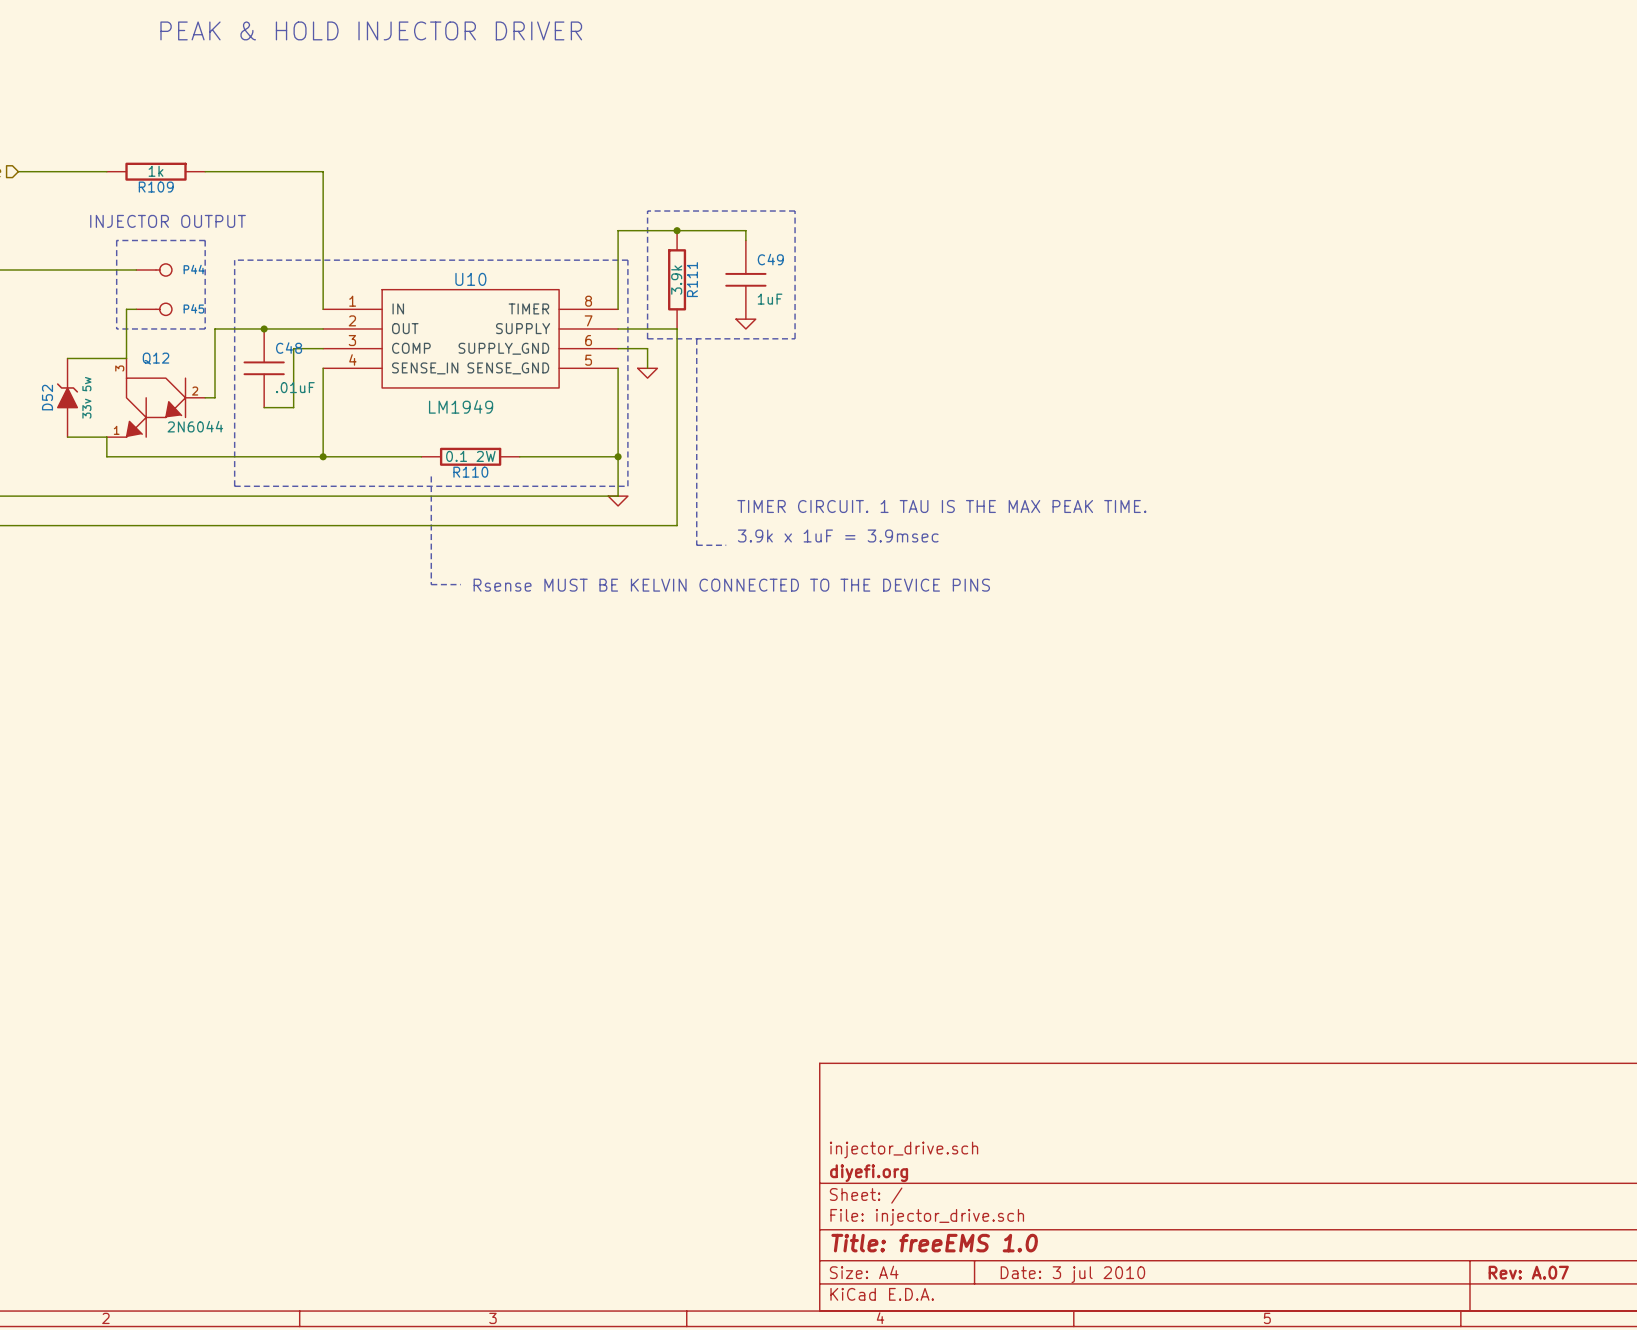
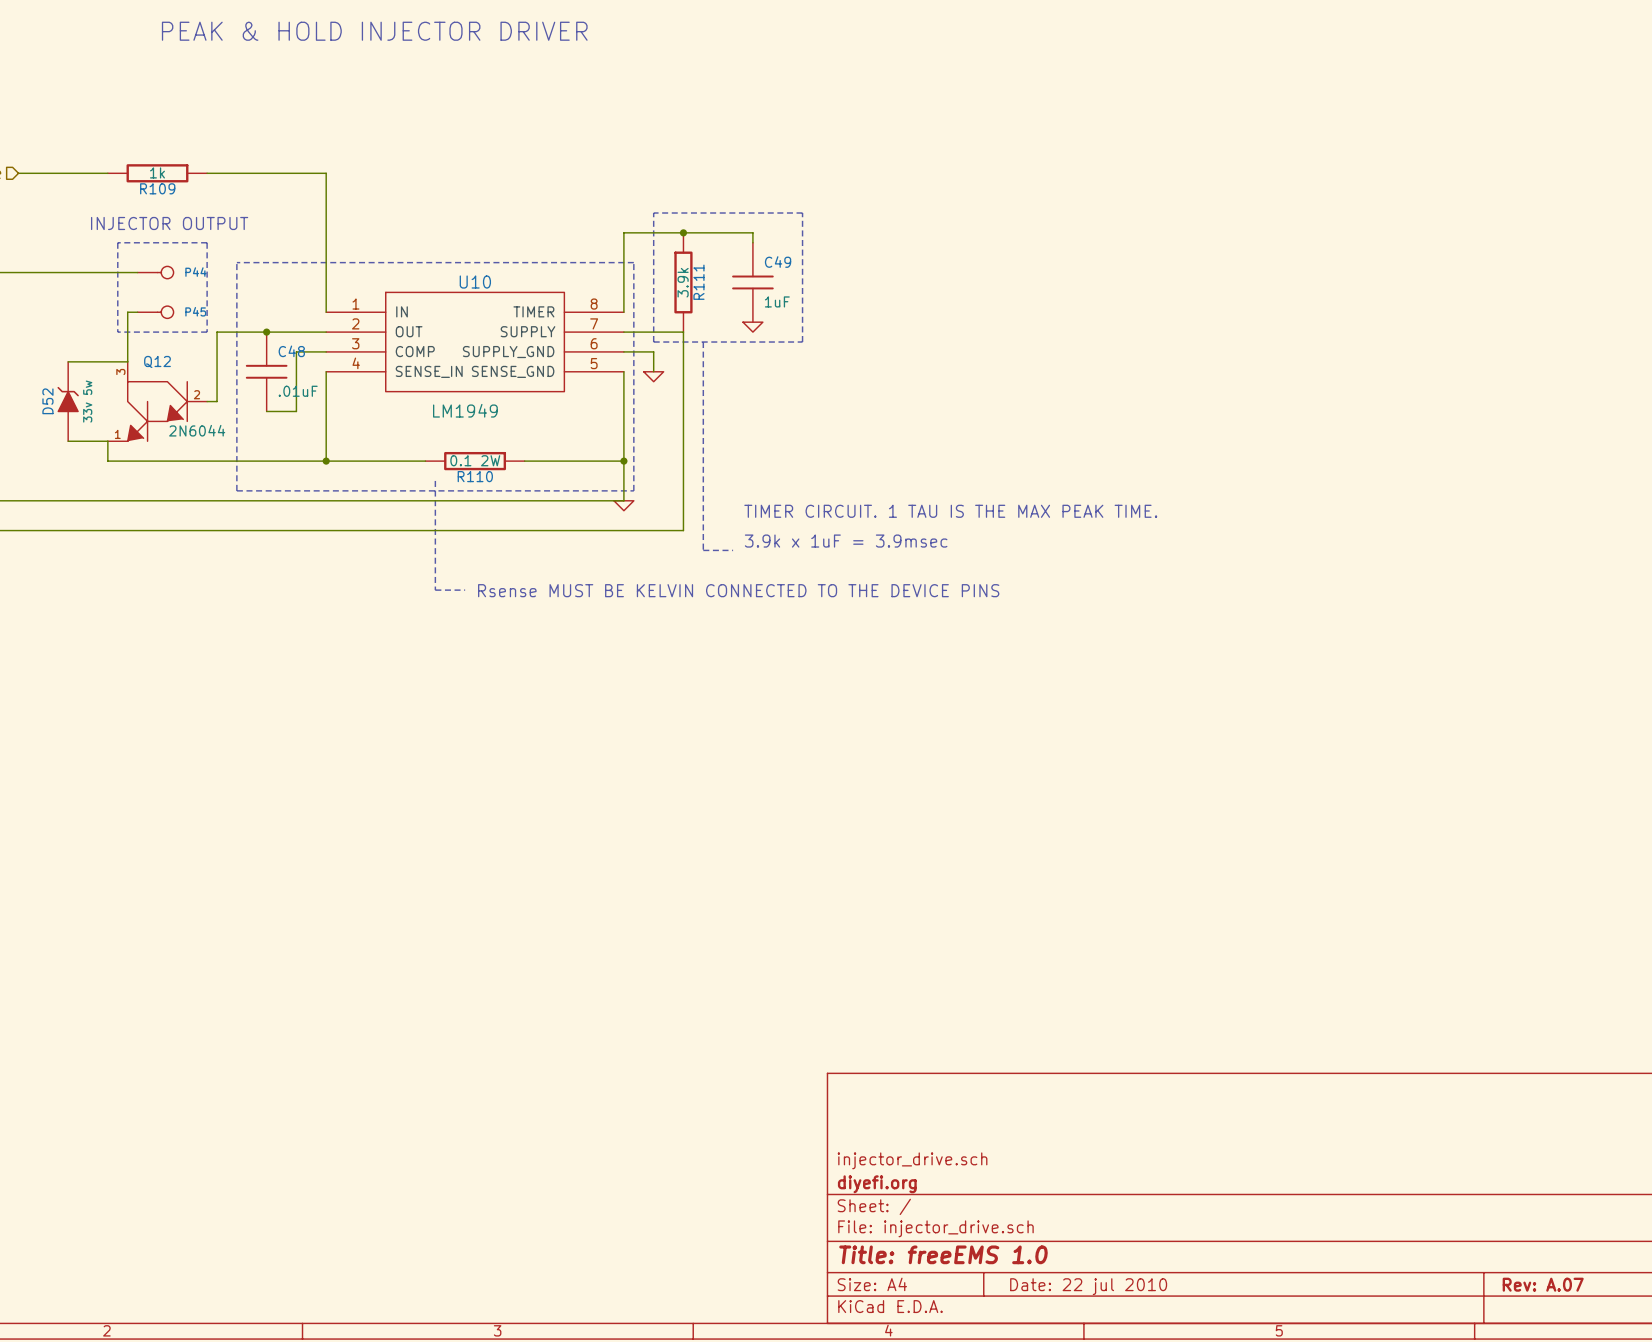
title block: Date: 3 jul 2010 (1072, 1274) -> Date: 22 jul 2010 (1088, 1286)

